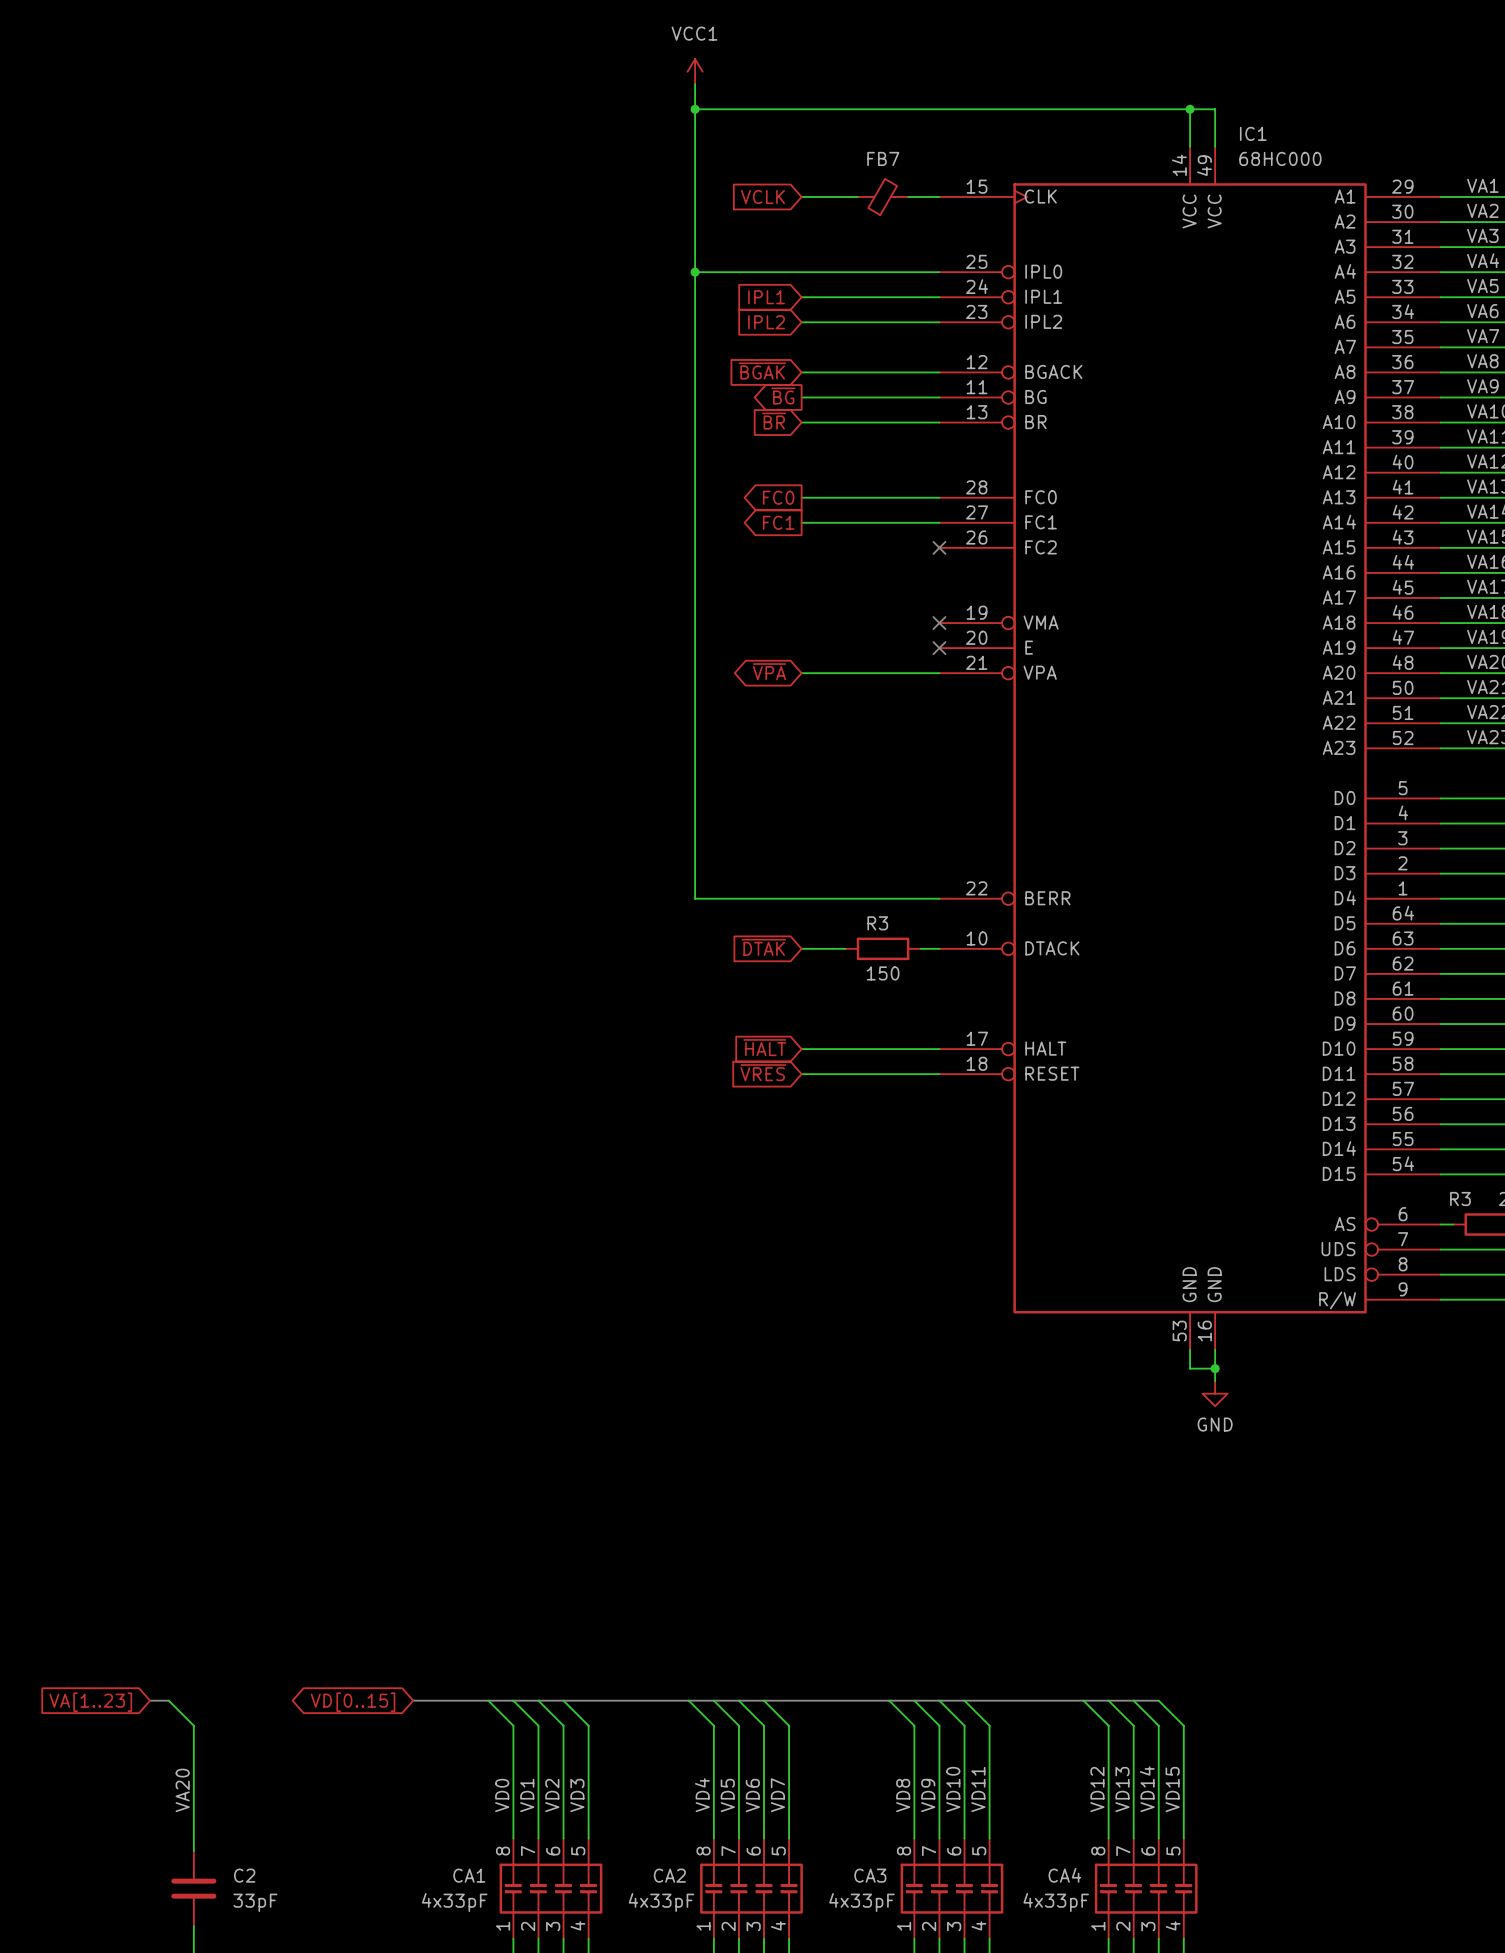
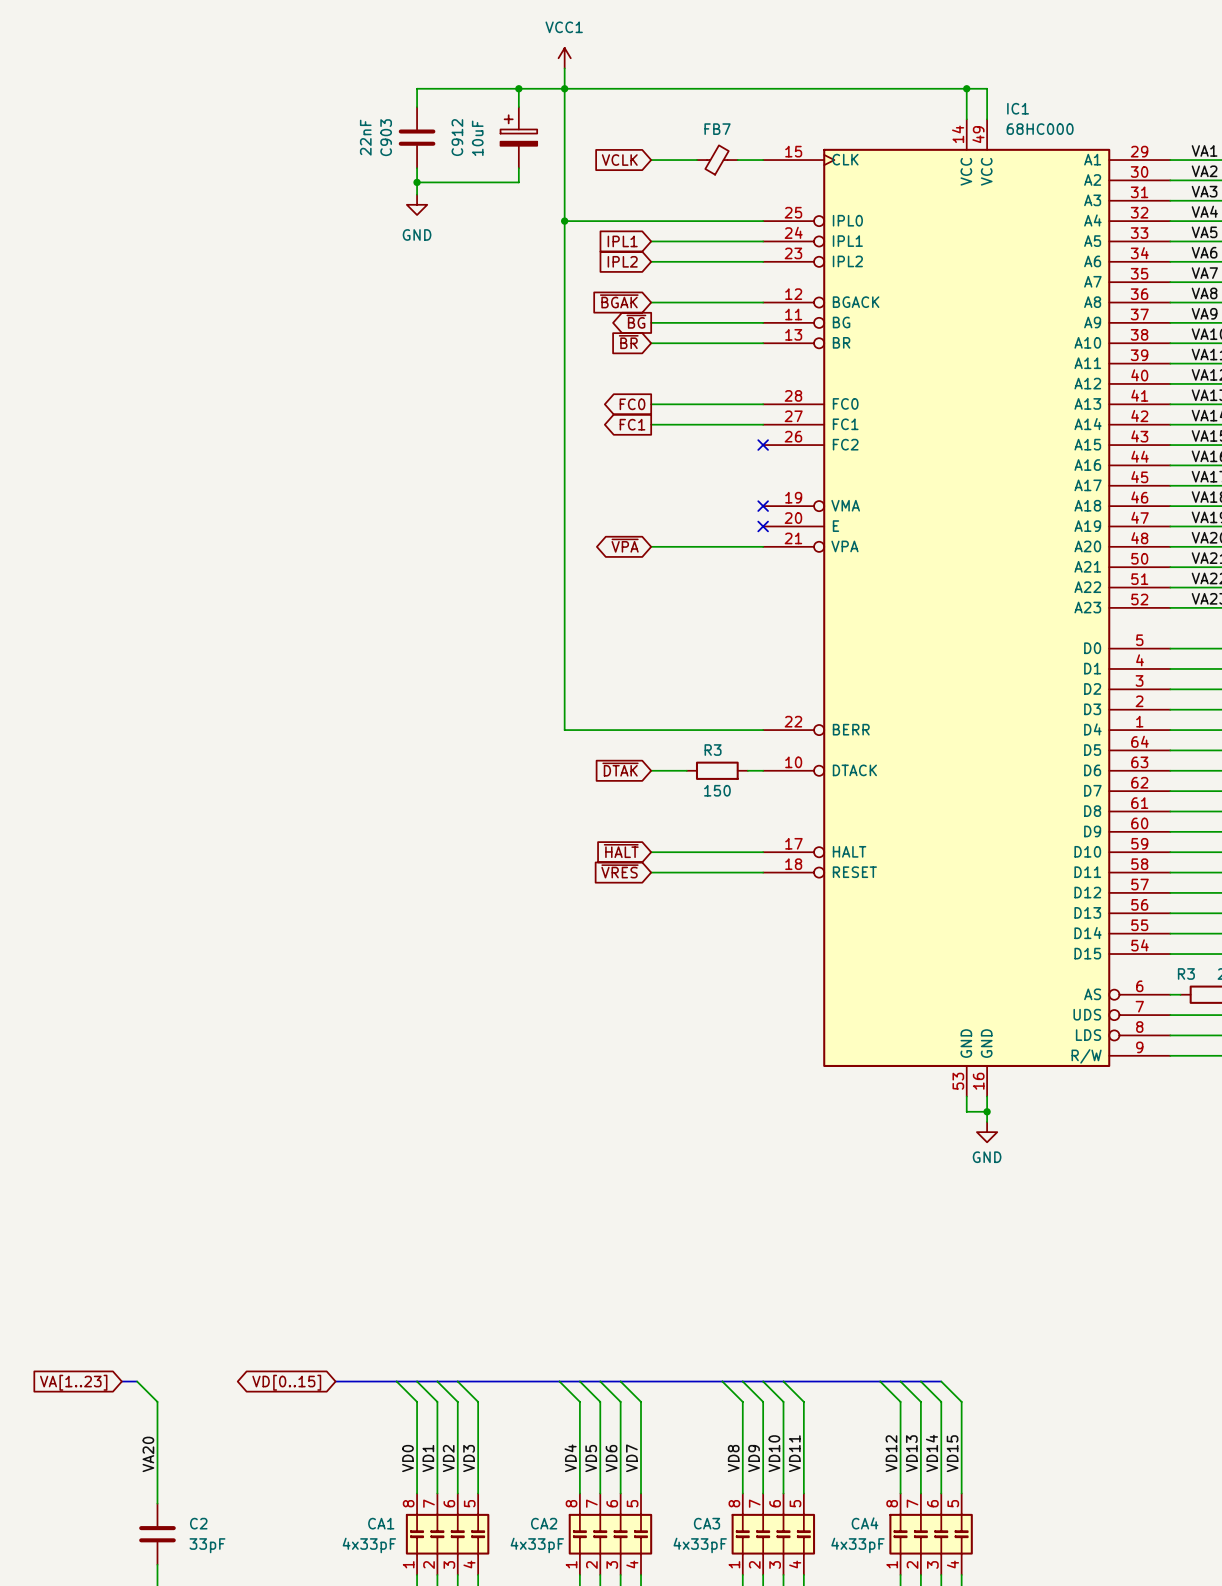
wire: none -> (518, 88) (518, 107)
junction: none -> (518, 88)
wire: none -> (564, 88) (417, 88) (417, 107)
C903: none -> 22nF (417, 137)
C912: none -> 10uF (518, 137)
wire: none -> (417, 168) (417, 194)
wire: none -> (518, 168) (518, 182) (417, 182)
junction: none -> (417, 182)
power symbol: none -> GND (417, 204)

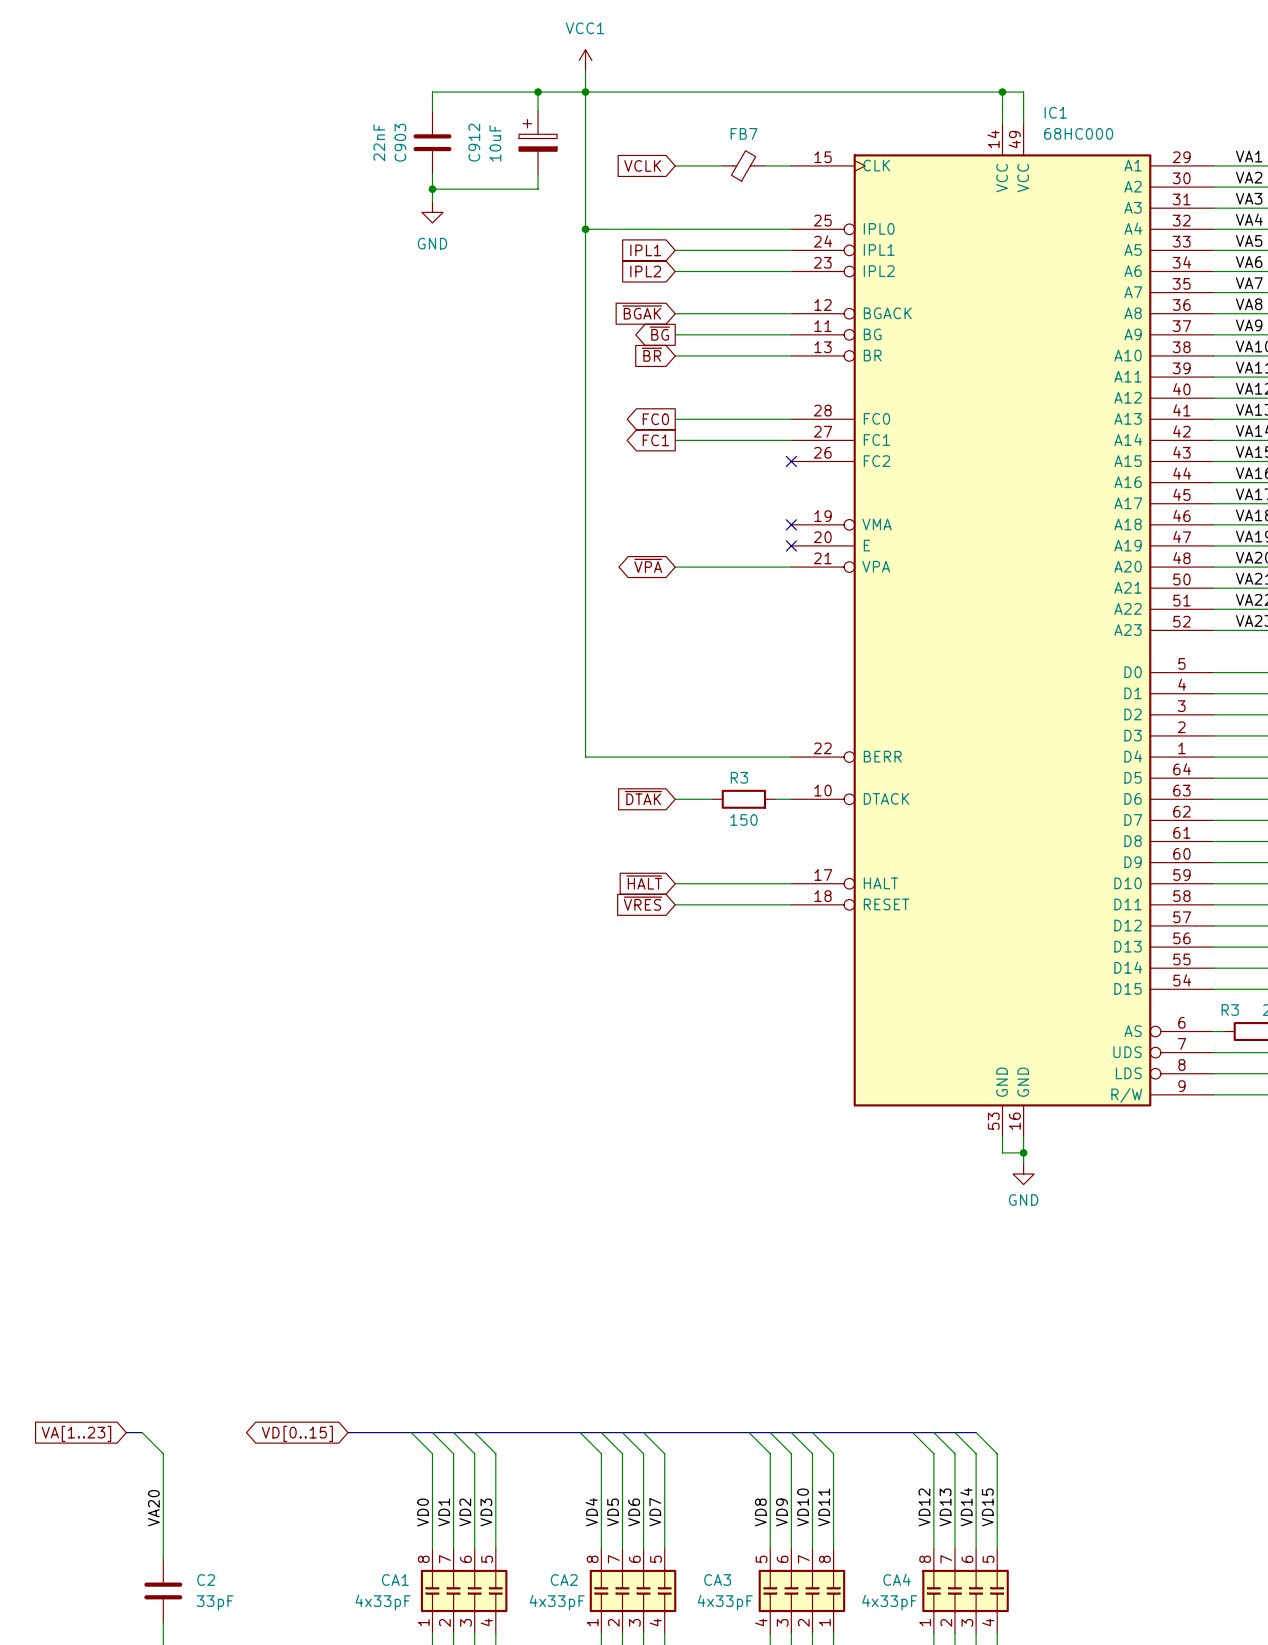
CA3 name position: CA3 (706, 1523) -> CA3 (717, 1580)
CA3 flip: as is (773, 1534) -> left-right (801, 1590)

